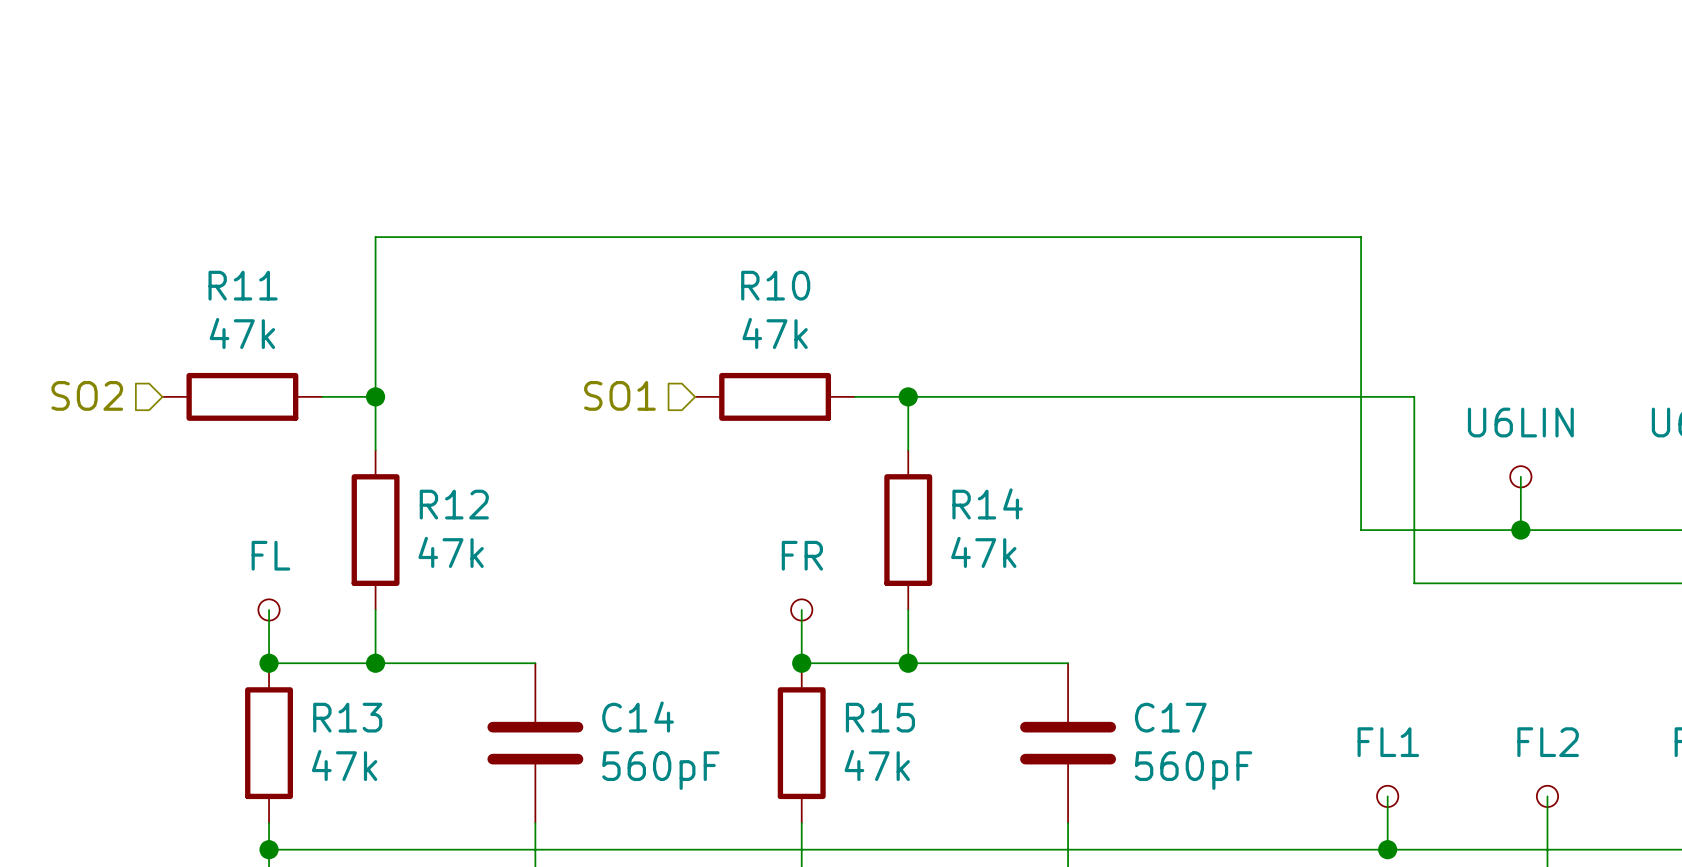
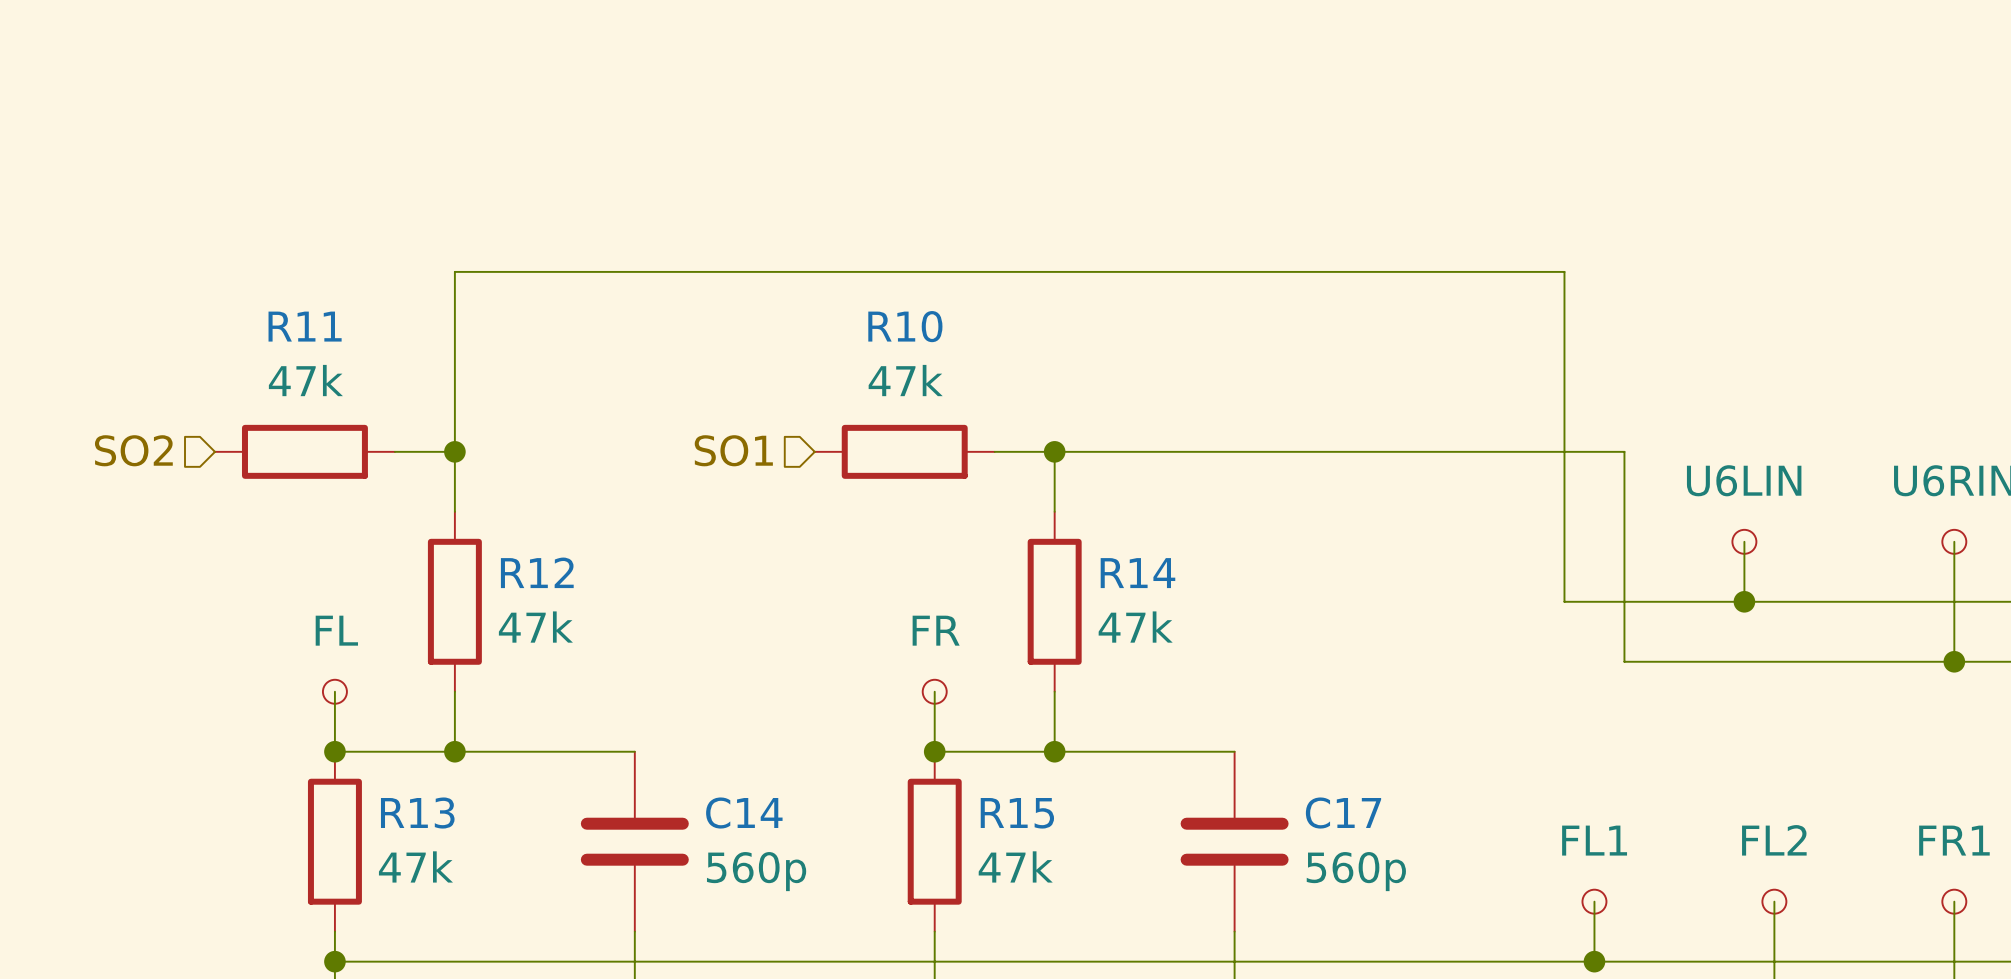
C14 value: 560pF (660, 770) -> 560p (756, 871)
C17 value: 560pF (1193, 770) -> 560p (1356, 871)

